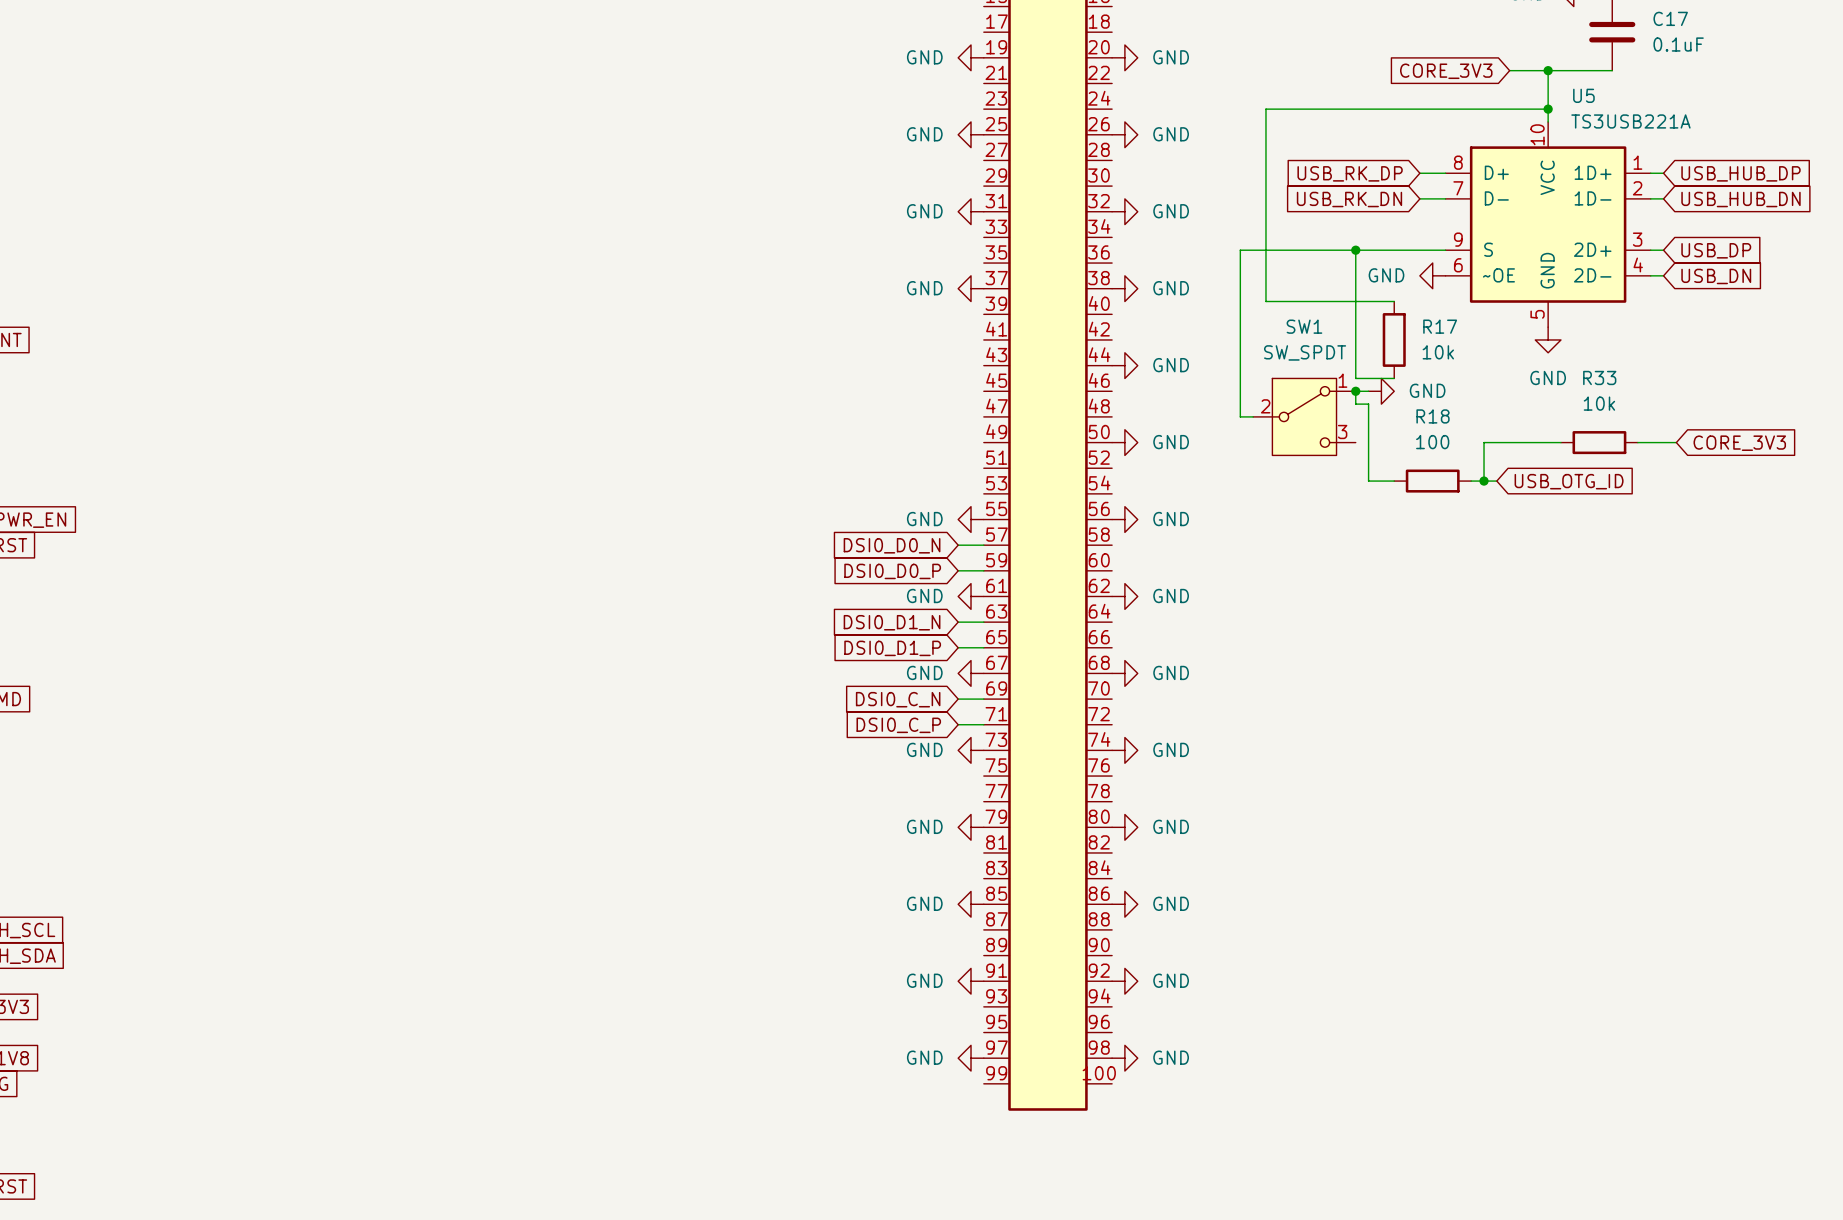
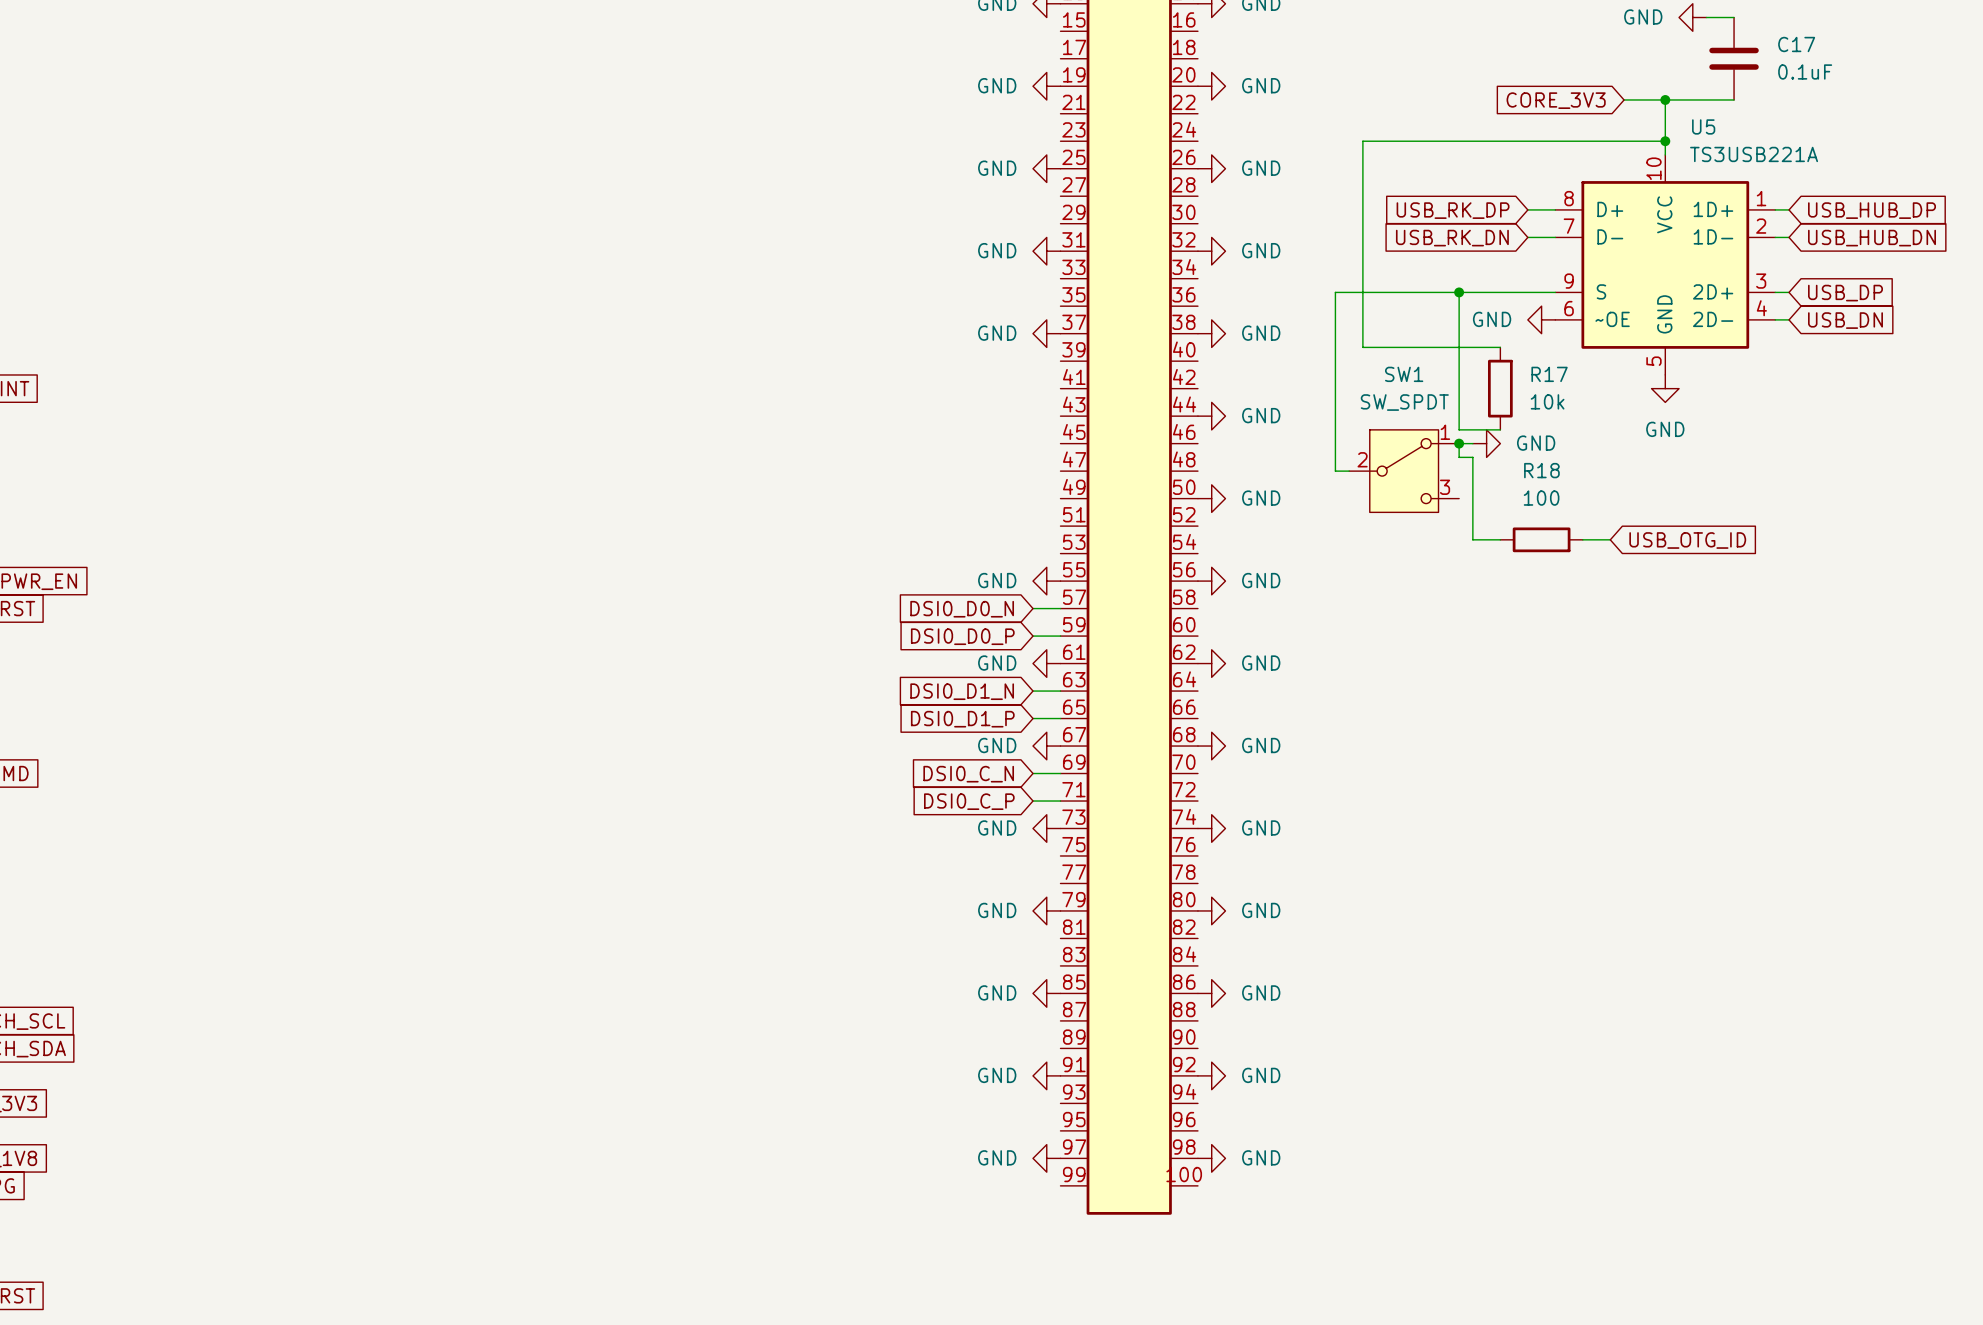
wire: (1560, 442) (1484, 442) (1484, 481) -> none
R33: 10k (1599, 442) -> none
wire: (1637, 442) (1676, 442) -> none
global label: CORE_3V3 (1739, 443) -> none
junction: (1484, 481) -> none

